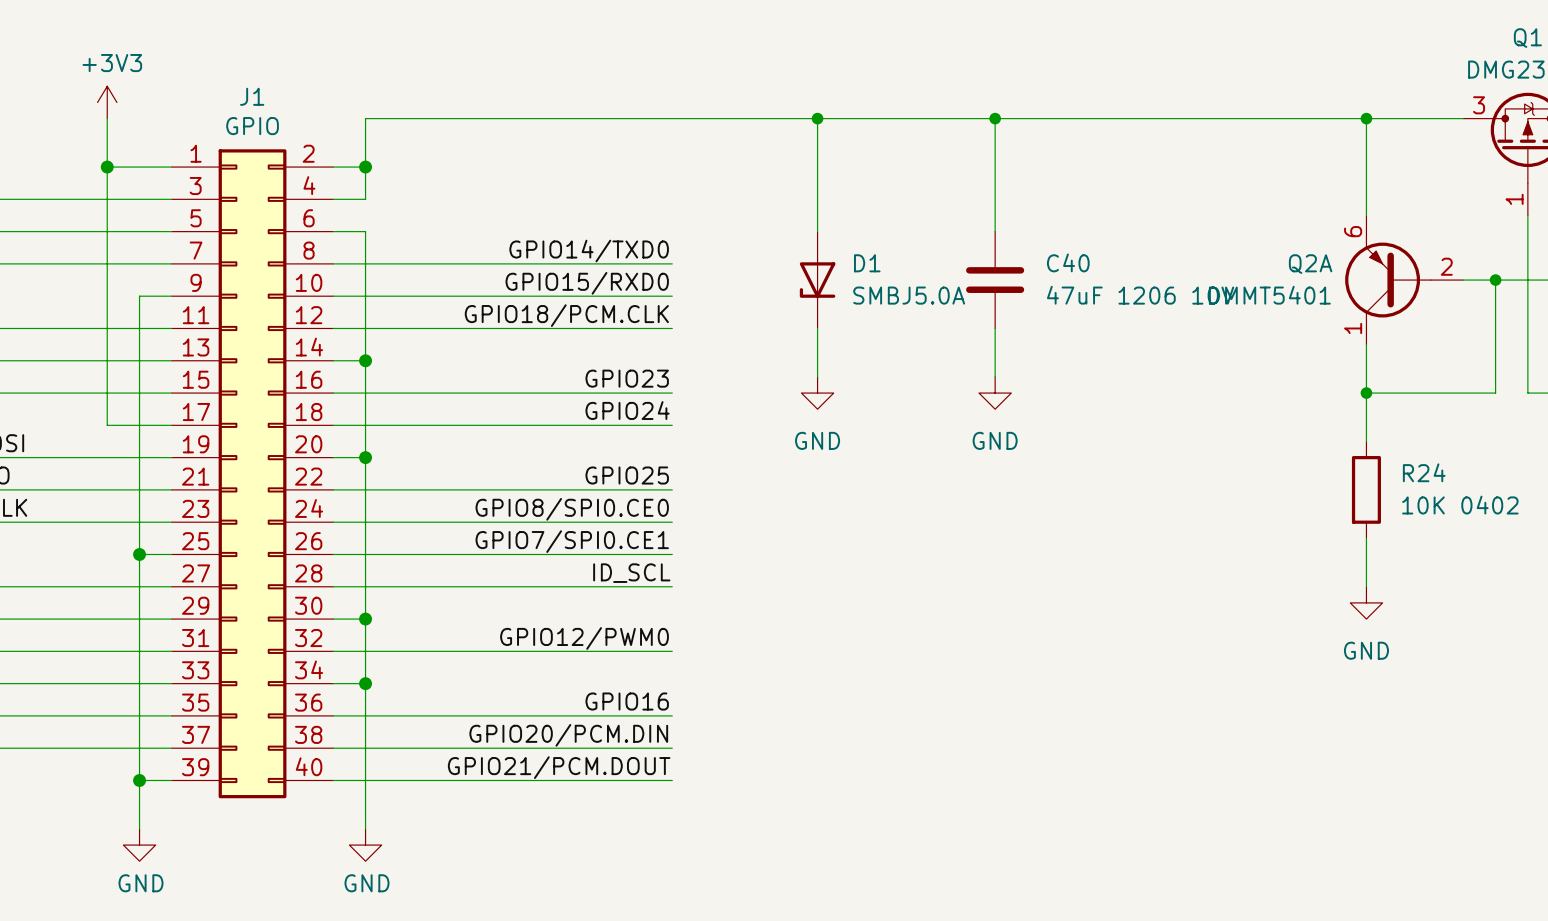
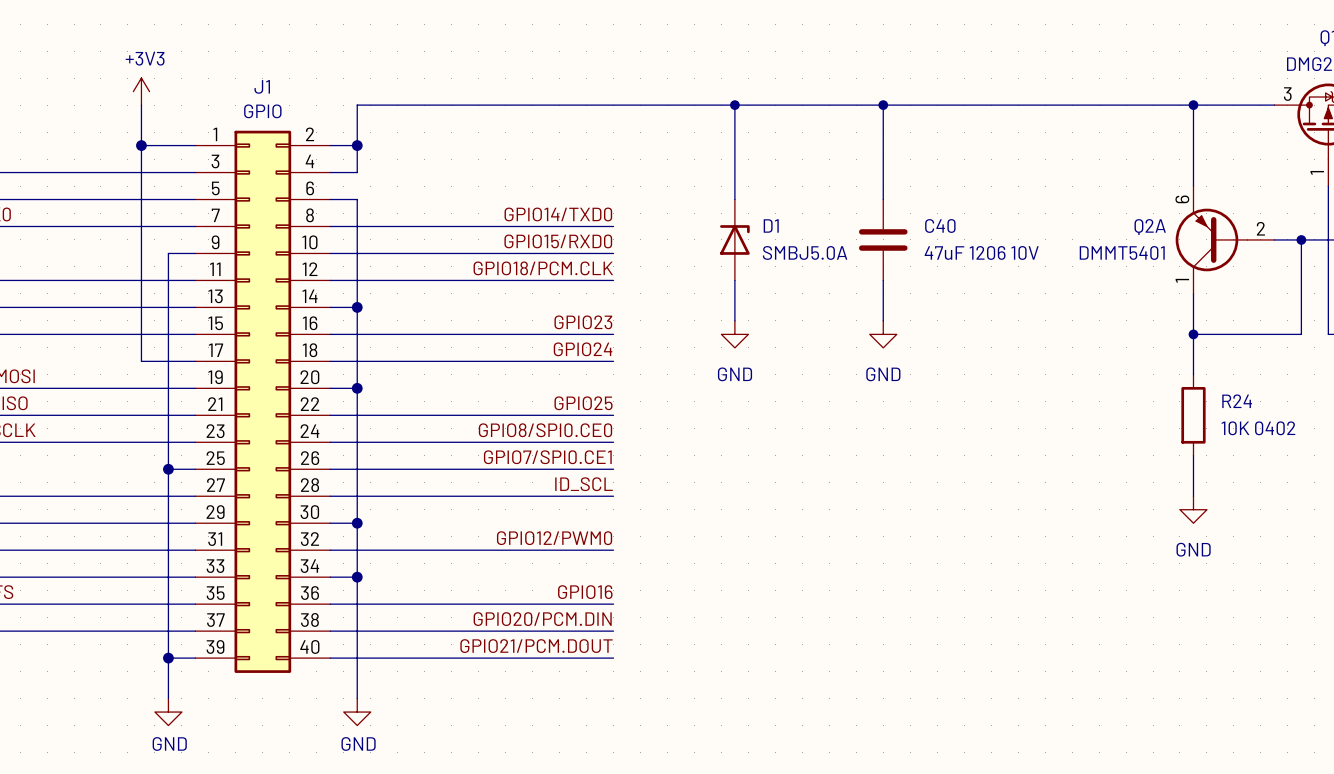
D1 rotation: 0° (817, 280) -> 180° (734, 239)

